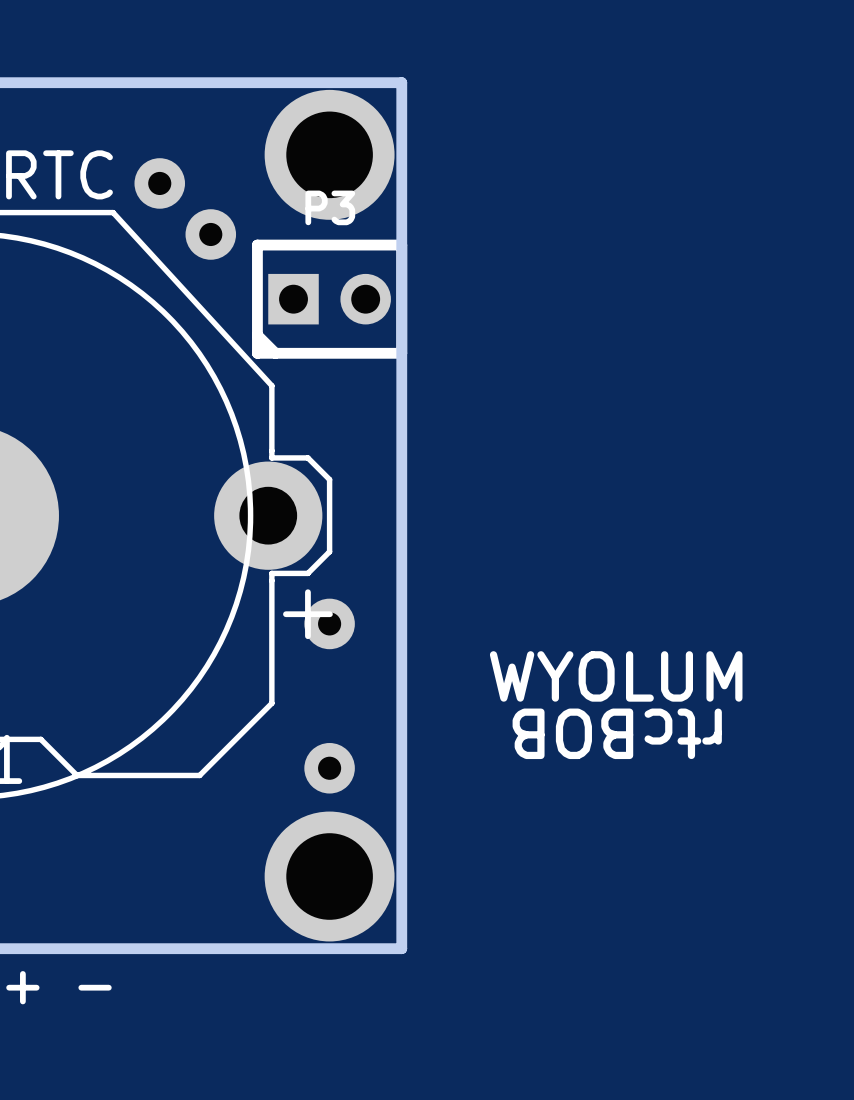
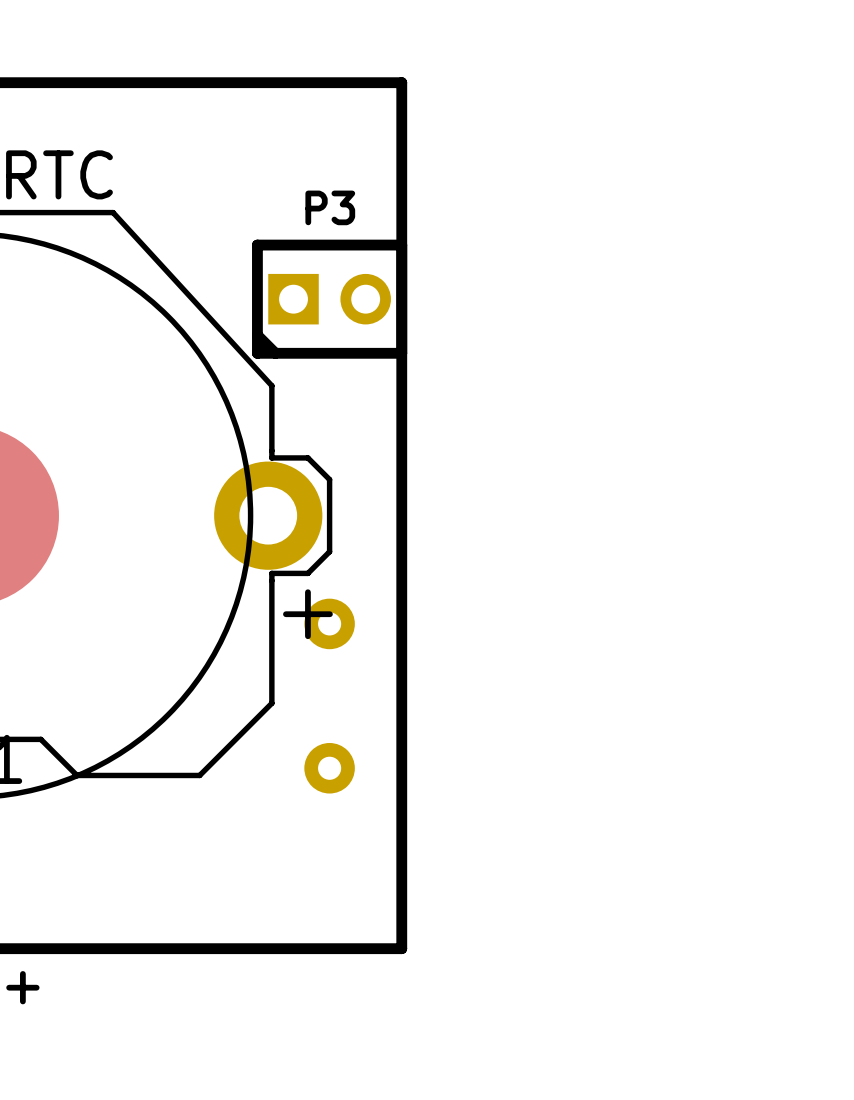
part: (329, 154) -> none
part: (185, 208) -> none
text: WYOLUM (616, 676) -> none
text: rtcBOB (617, 733) -> none
part: (329, 876) -> none
text: - (95, 987) -> none

